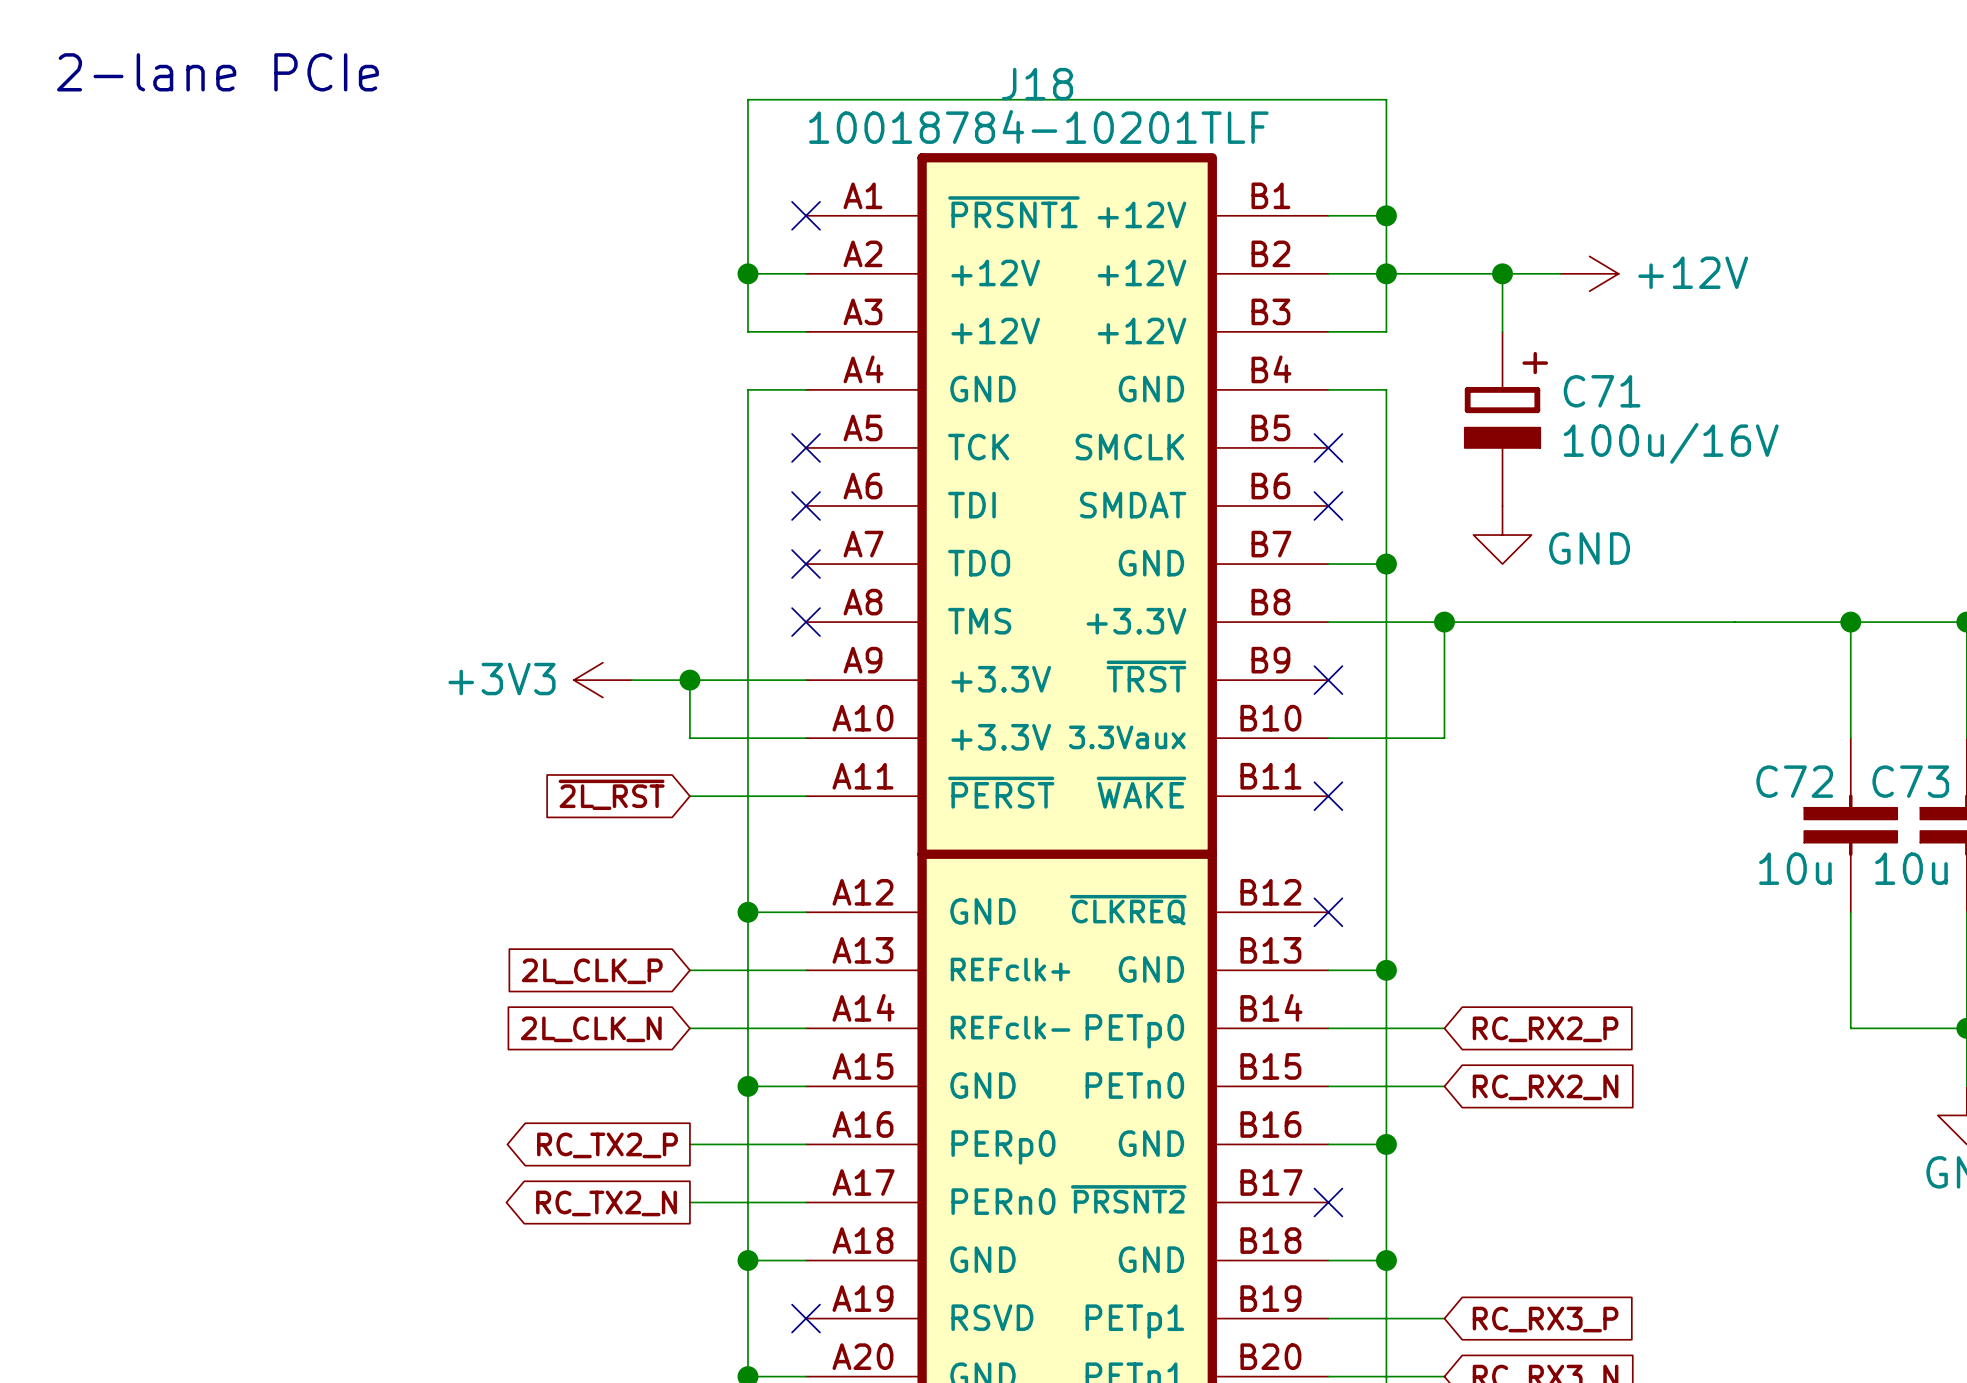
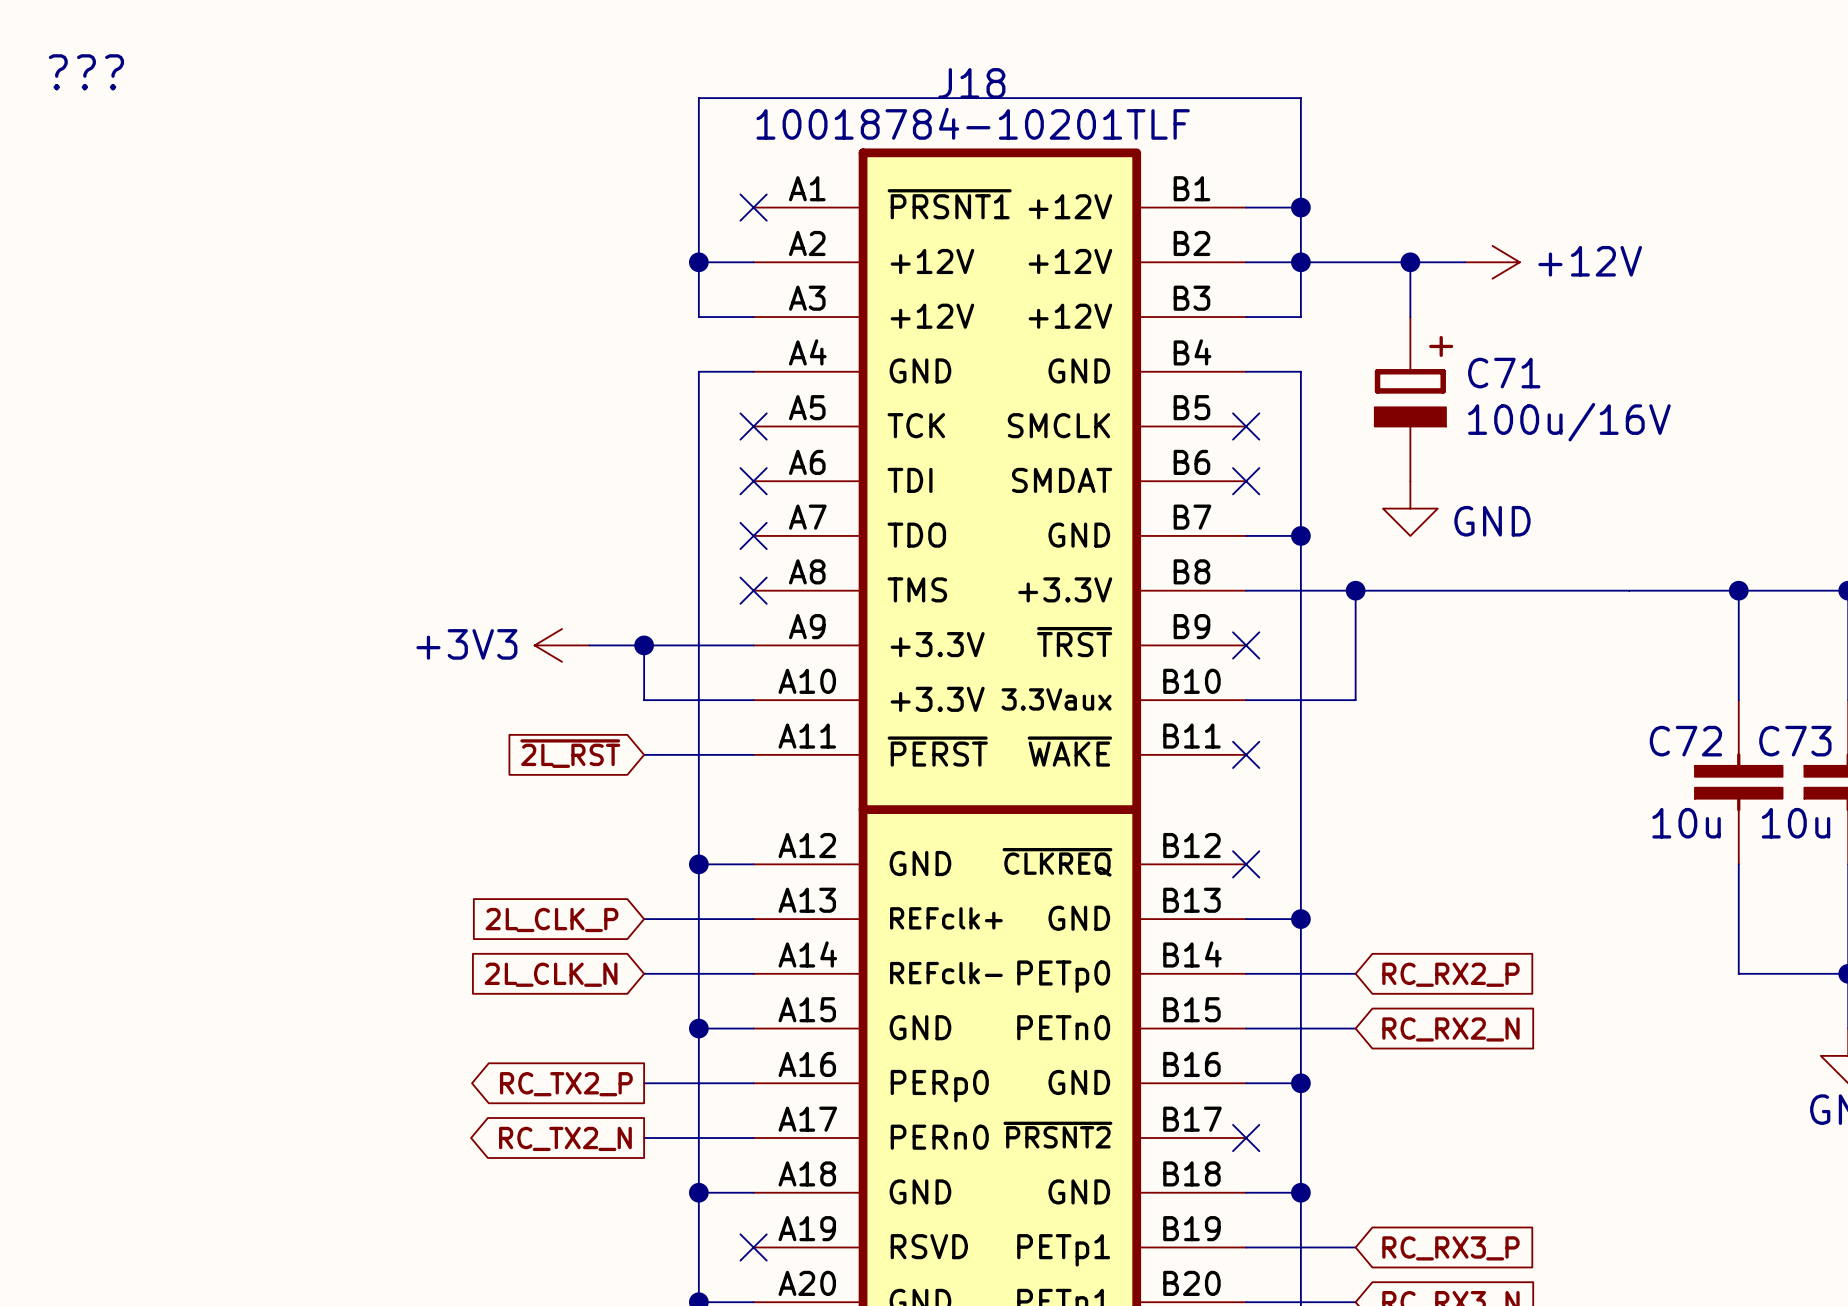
text: 2-lane PCIe (217, 72) -> ??? (86, 72)

